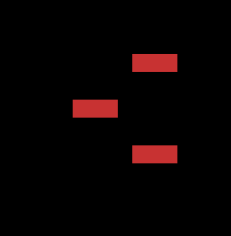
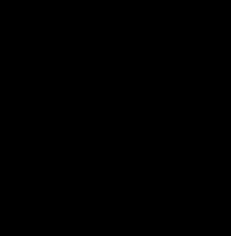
part: (125, 108) -> none

